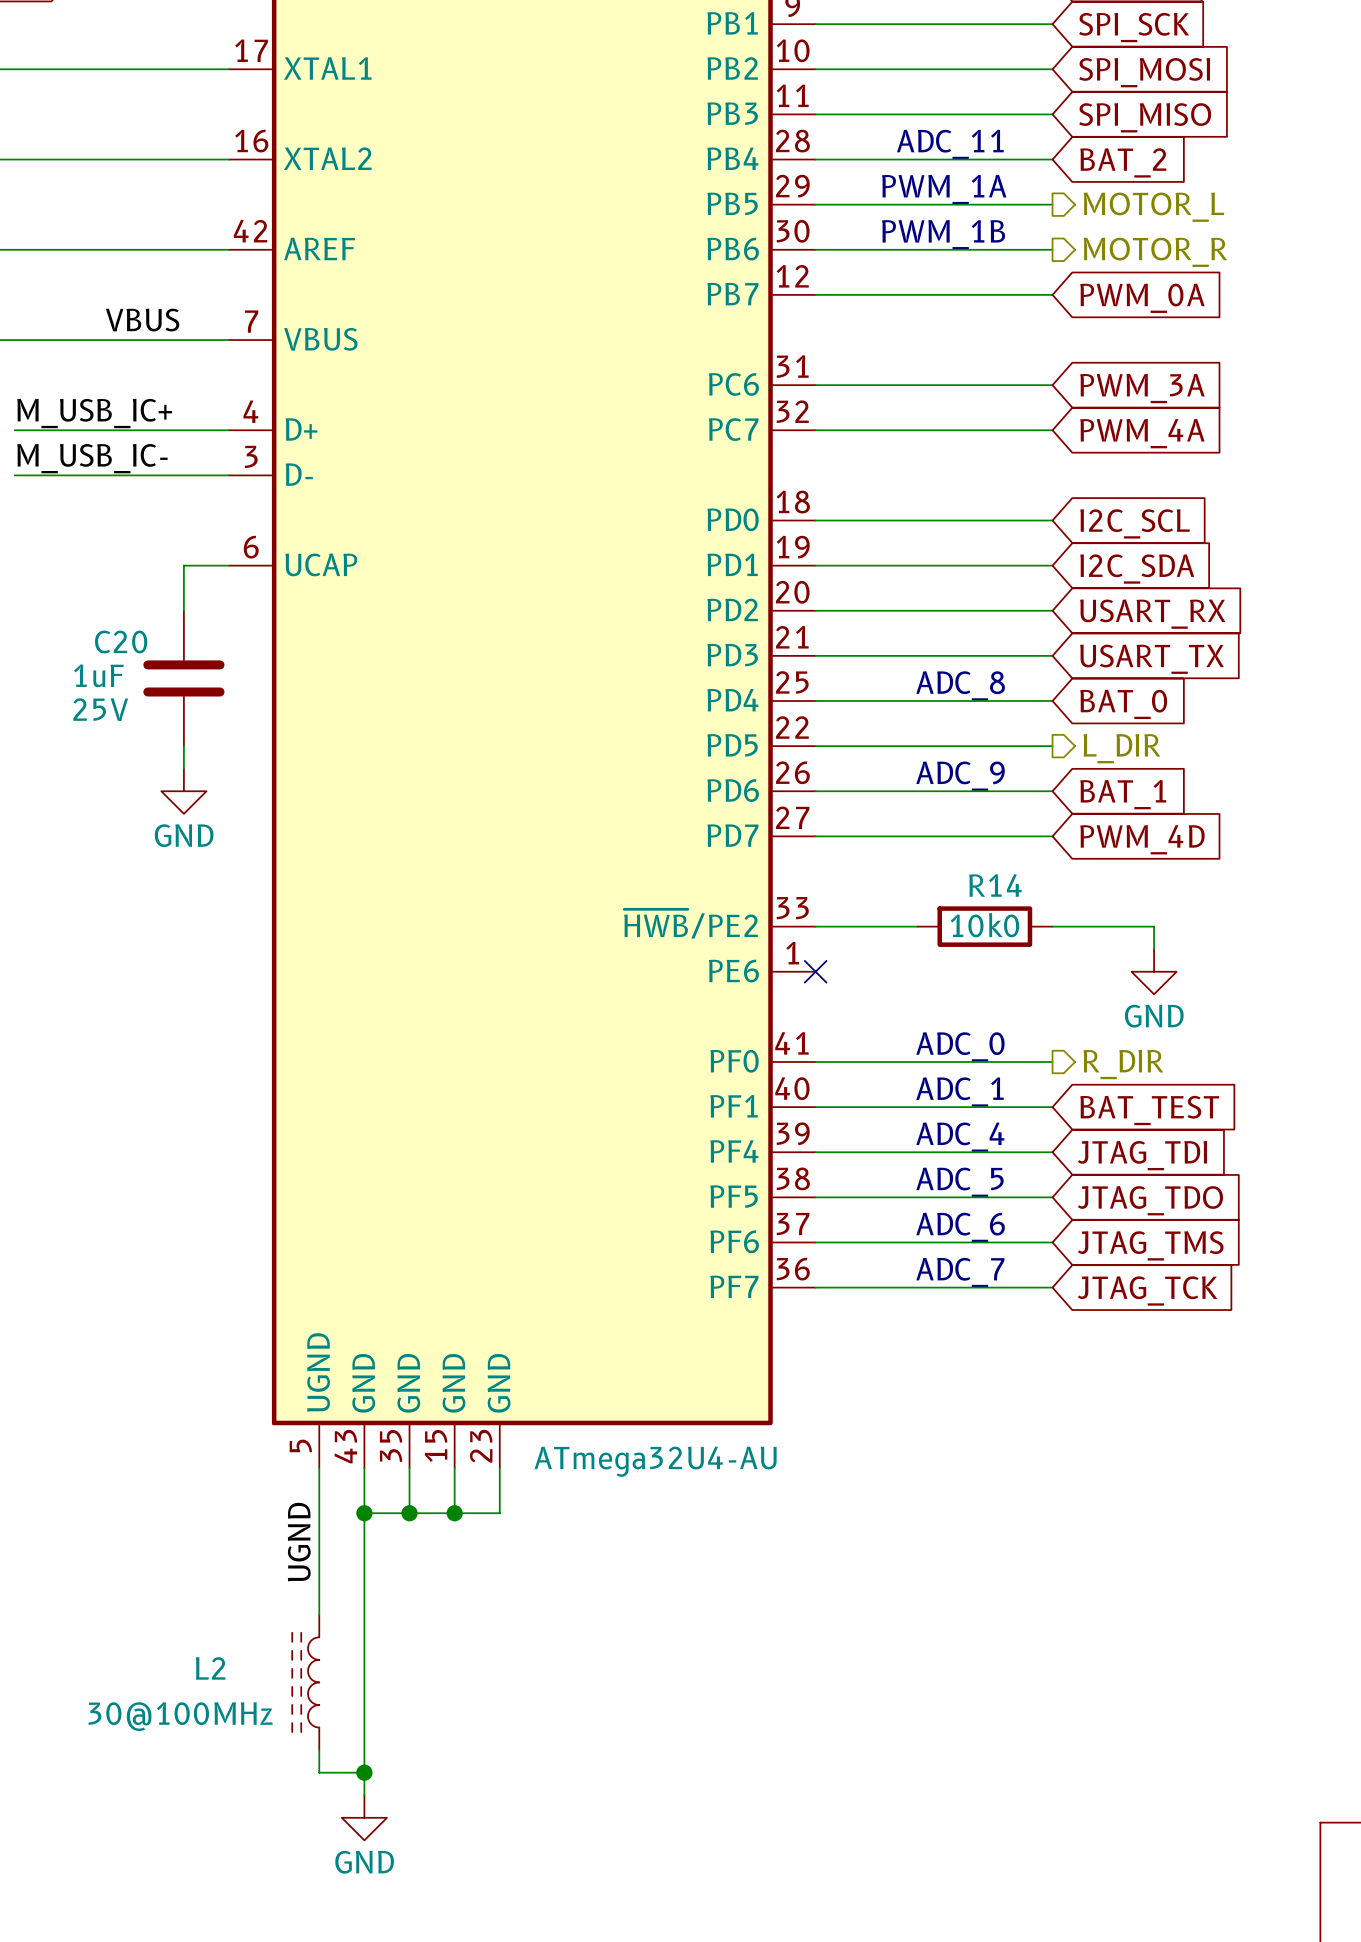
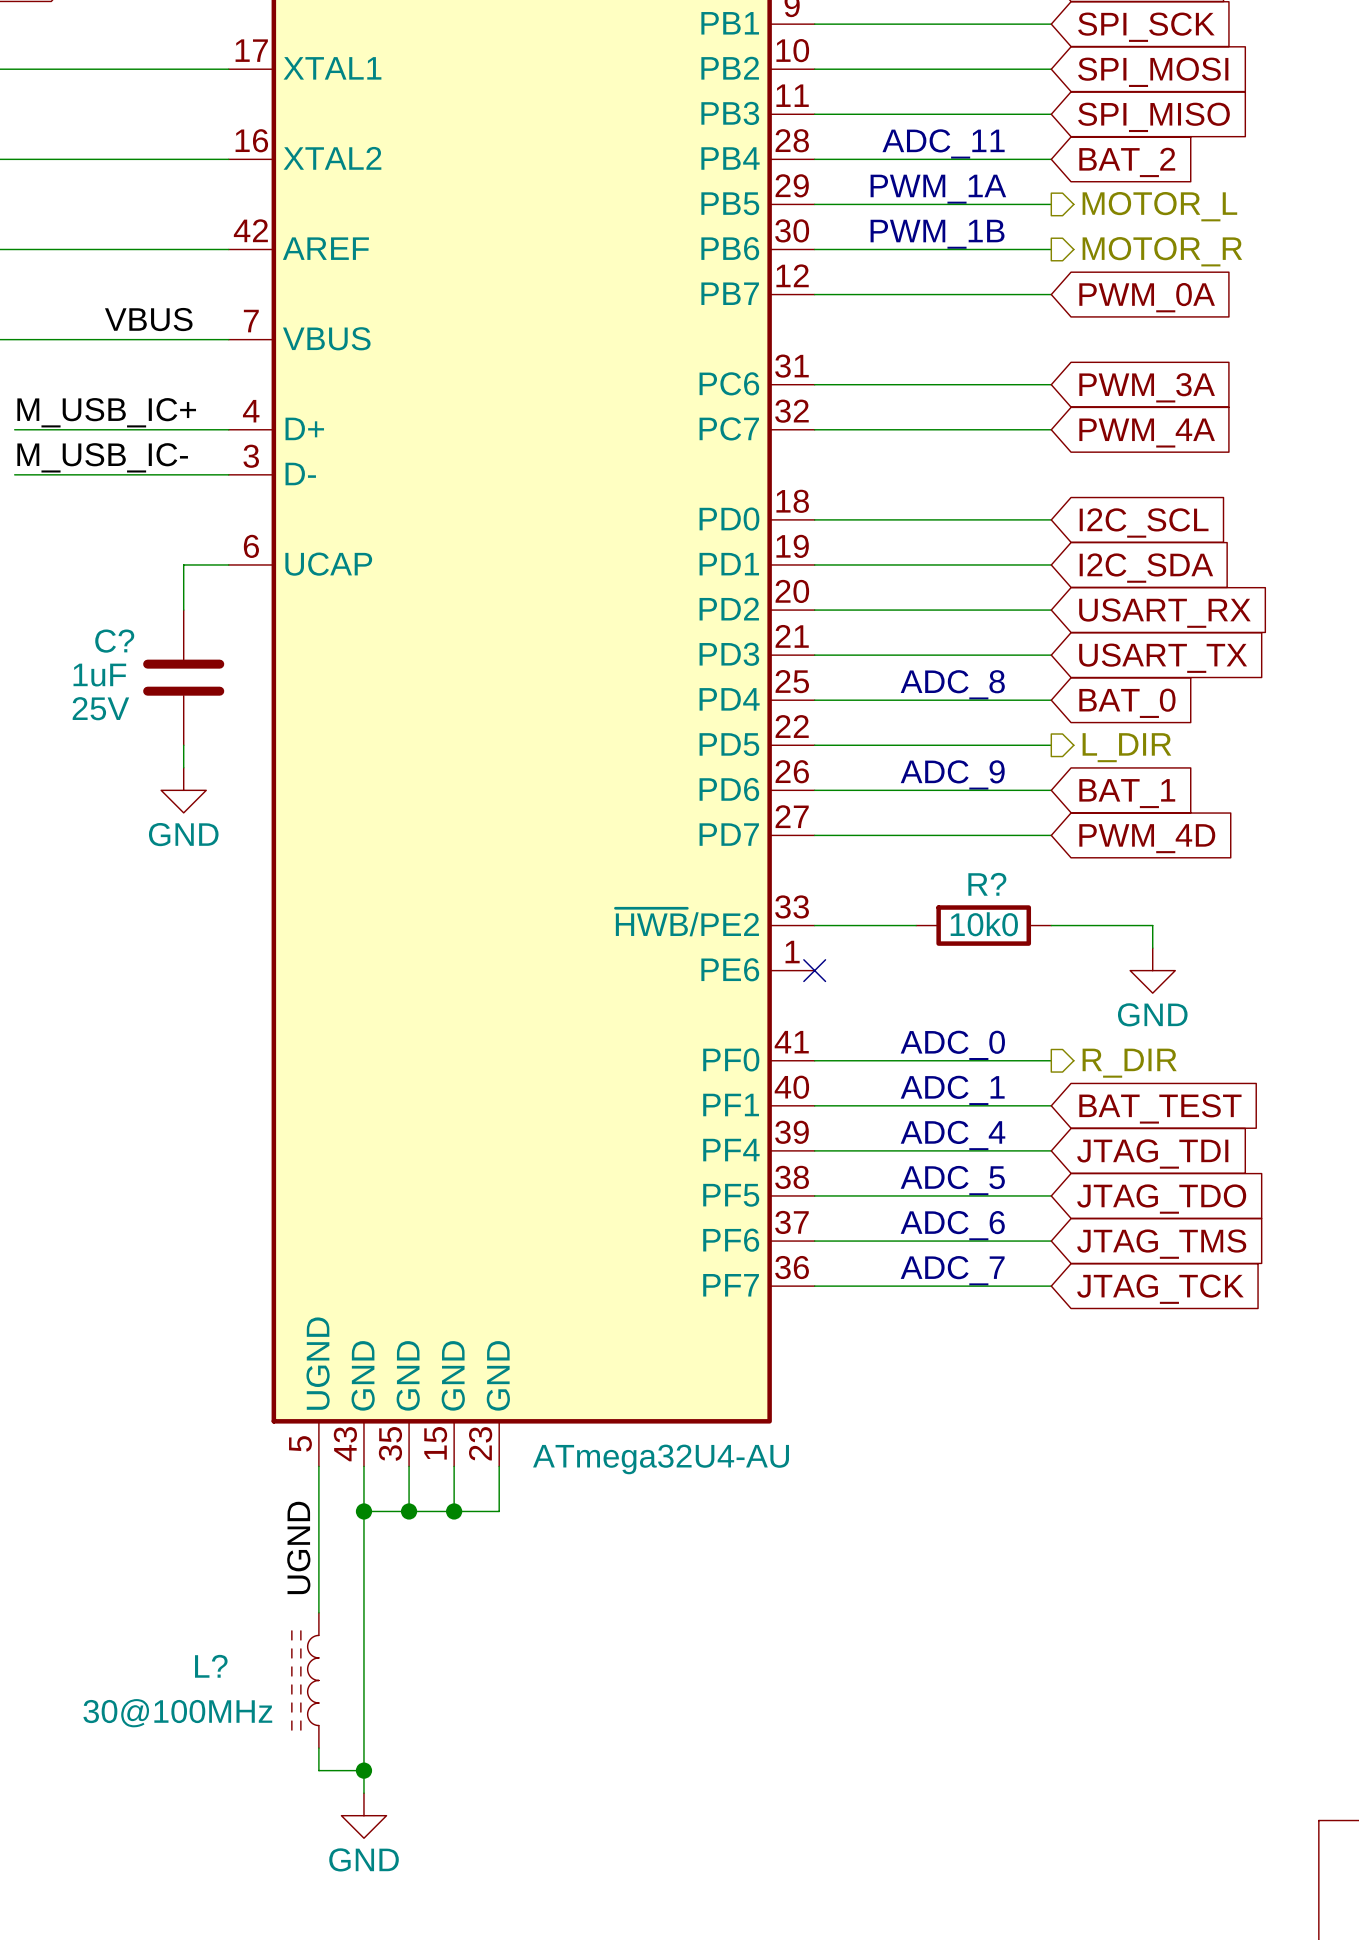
C20 name: C20 (121, 641) -> C? (114, 641)
R14 name: R14 (995, 885) -> R? (987, 884)
L2 name: L2 (210, 1668) -> L? (211, 1666)

